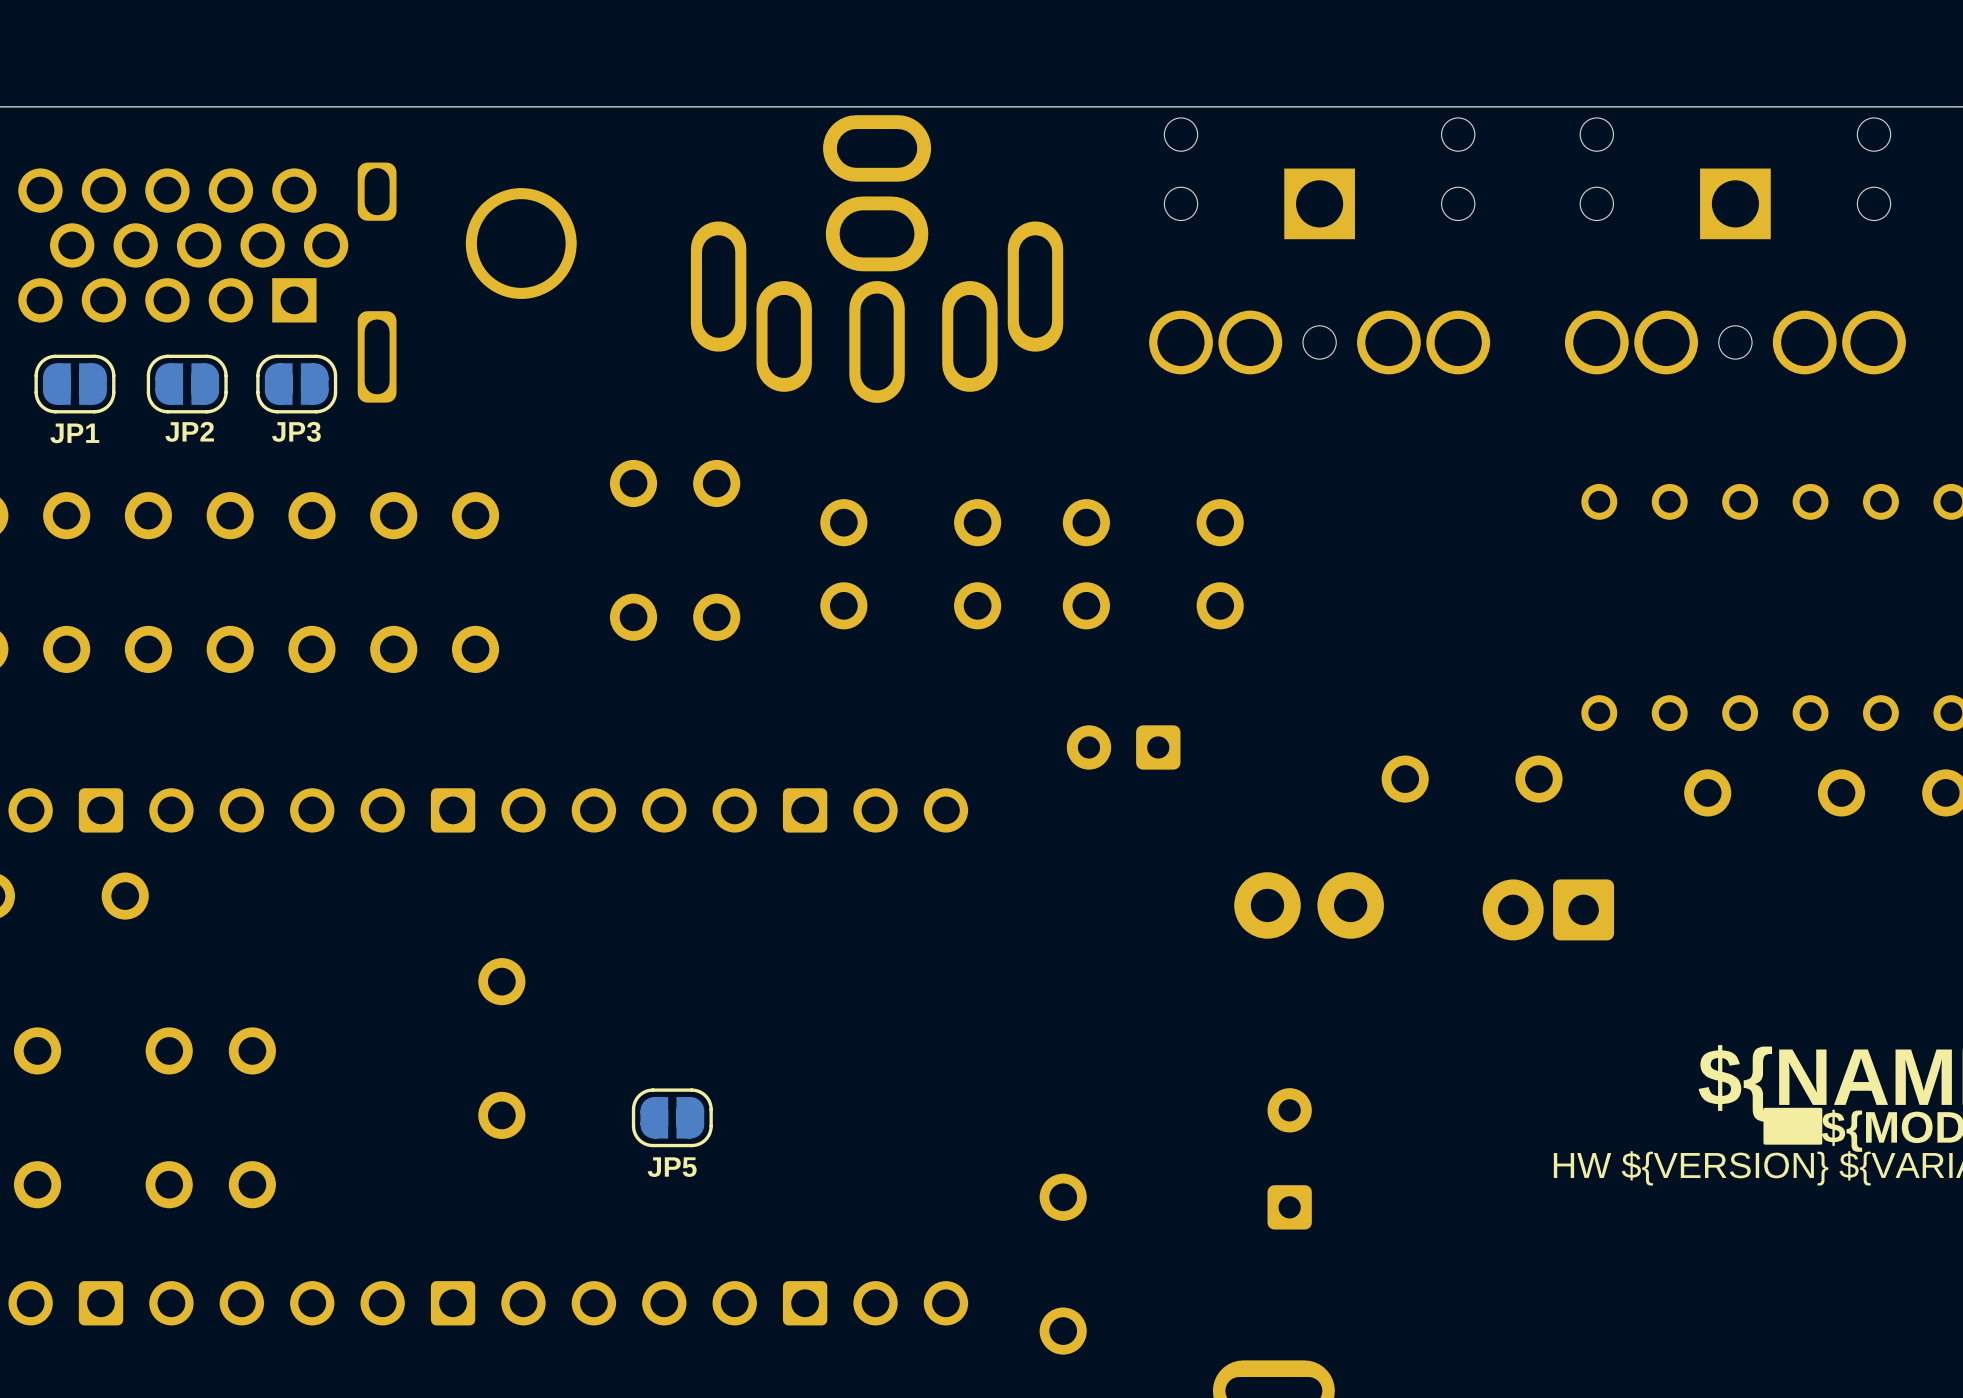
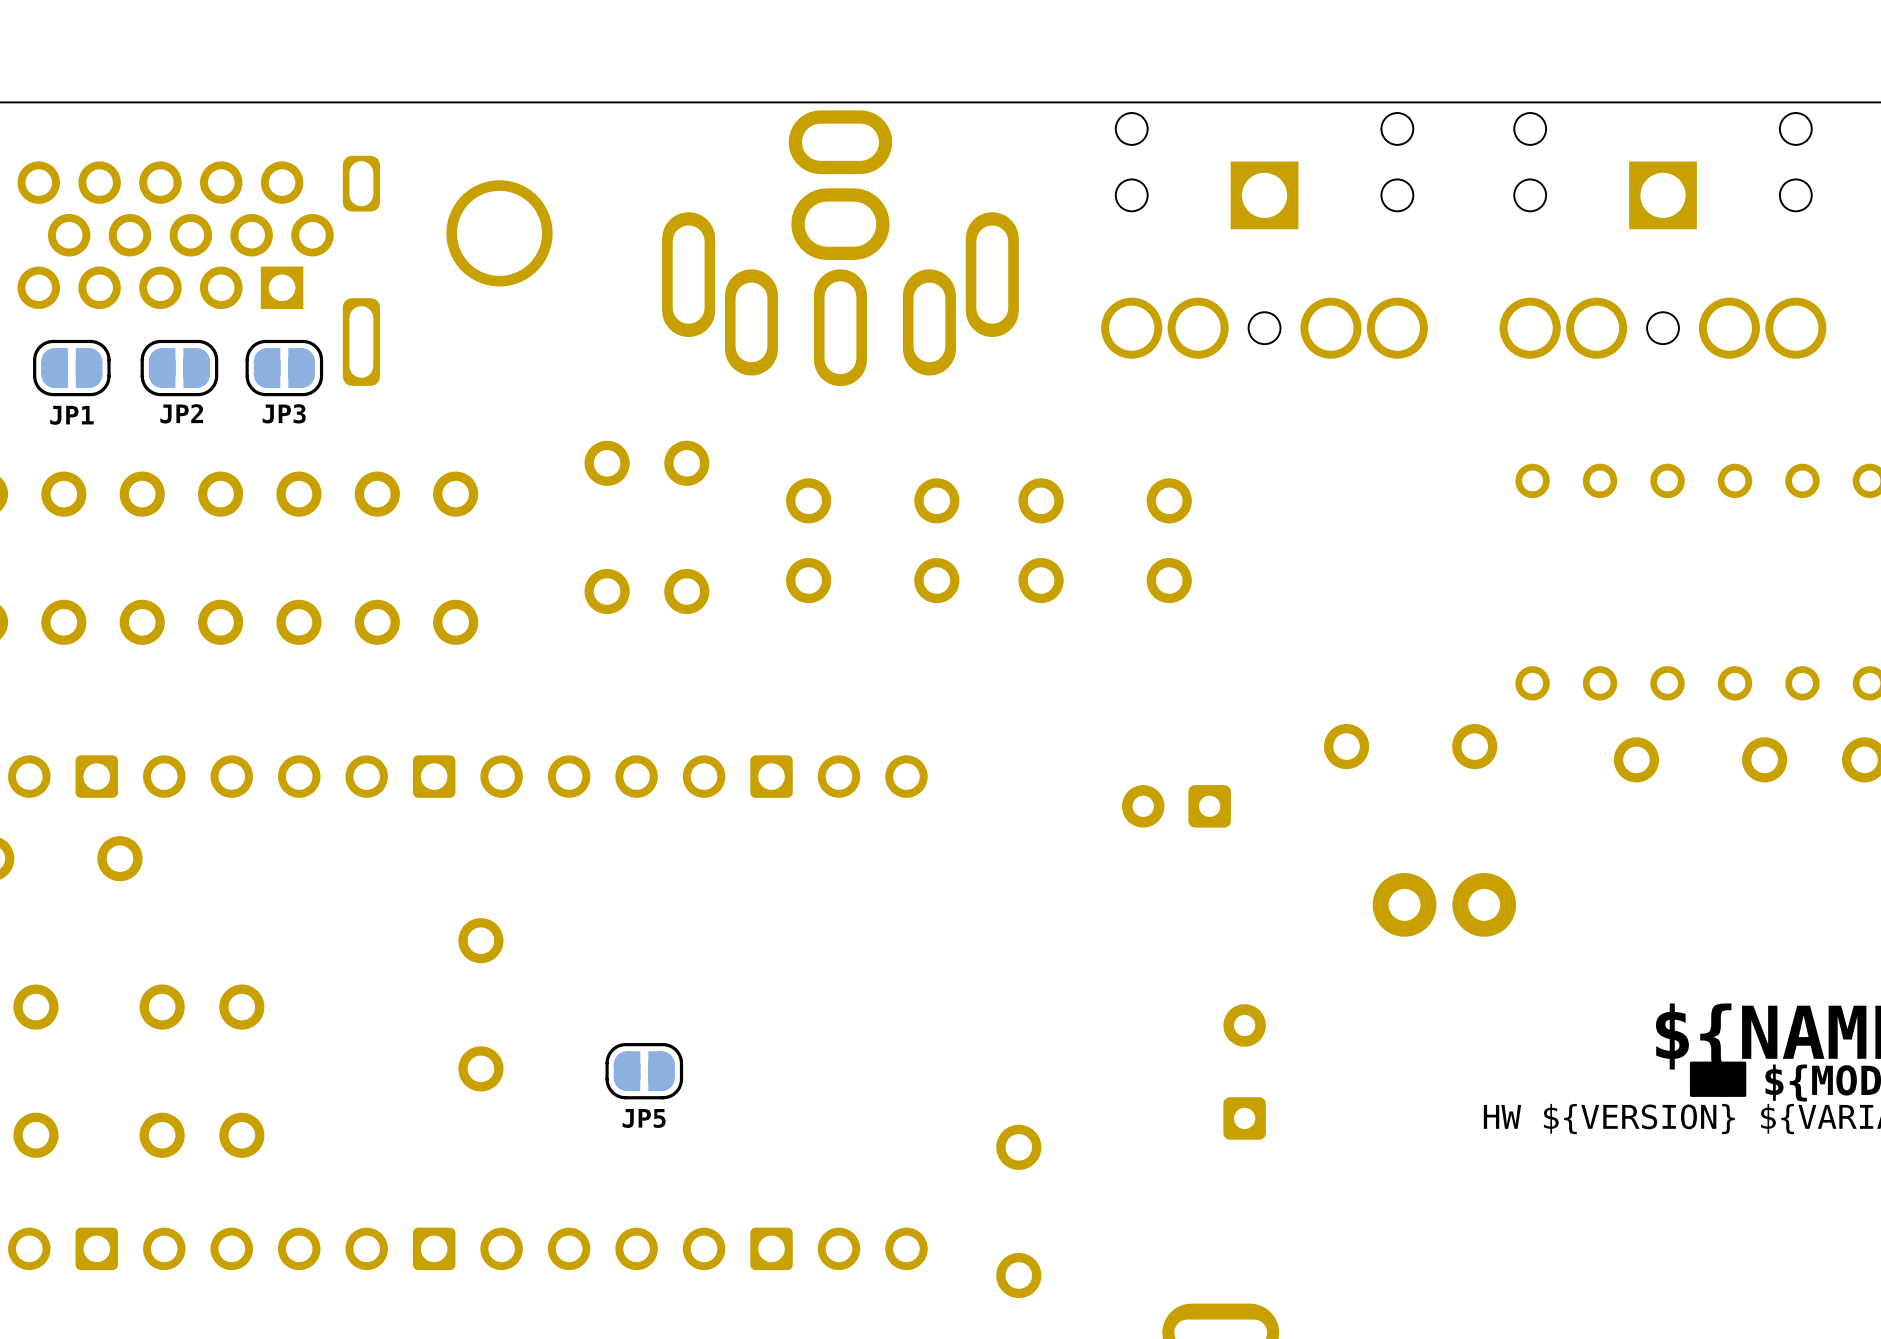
part position: (1123, 747) -> (1176, 806)
part position: (1309, 905) -> (1444, 904)
part: (1548, 909) -> none
part position: (1289, 1158) -> (1244, 1071)

